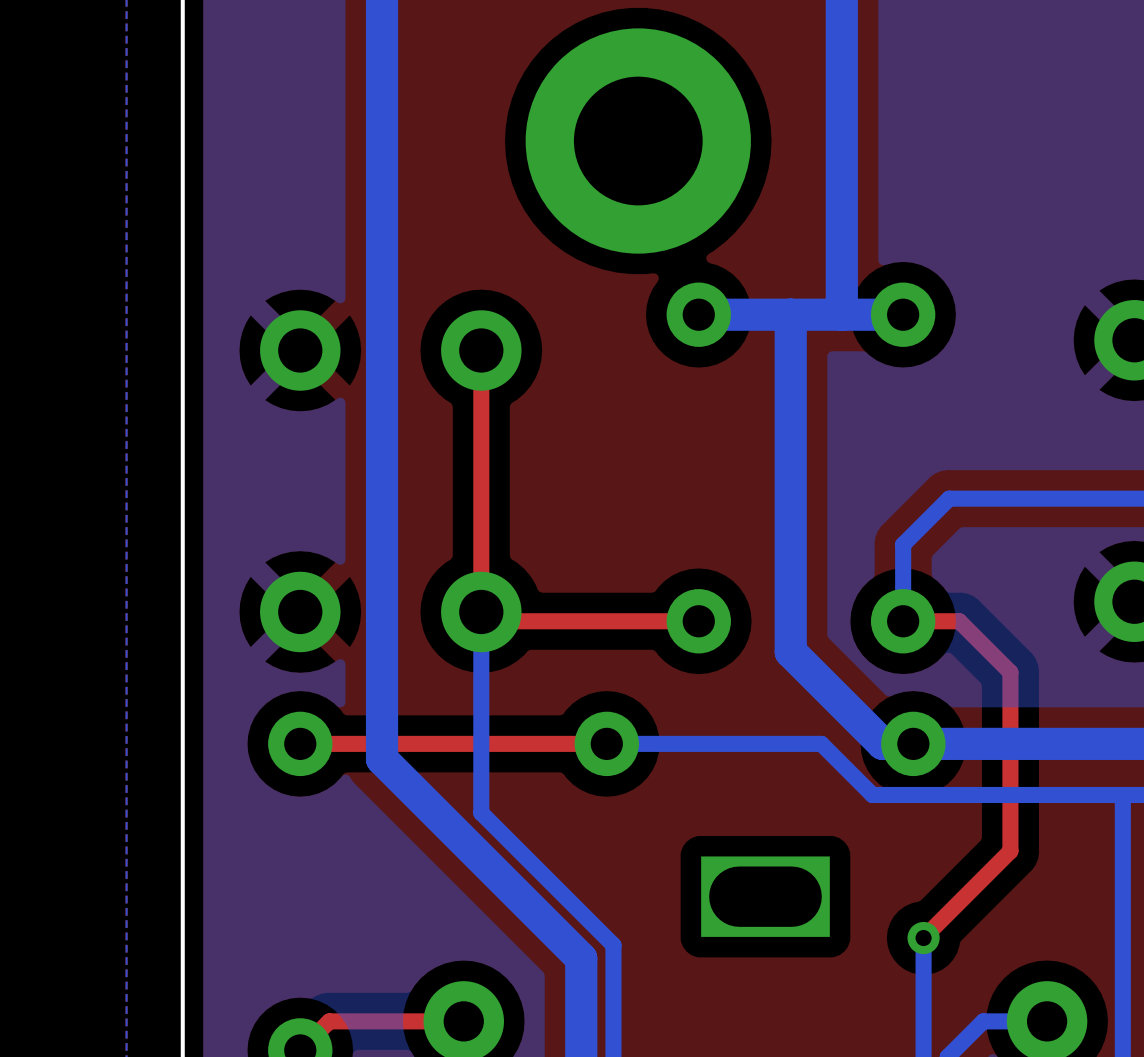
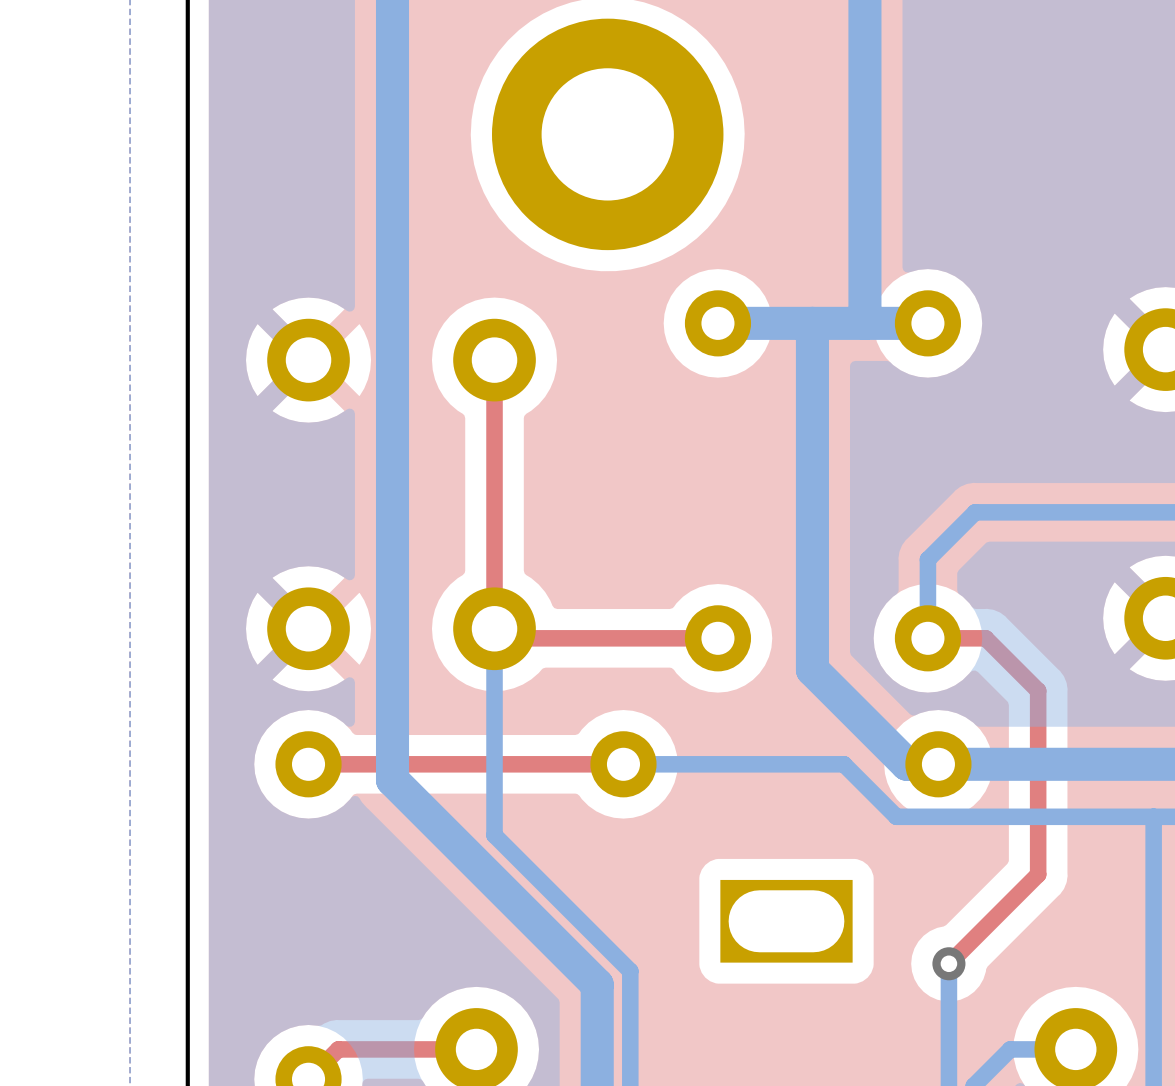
part position: (638, 141) -> (607, 134)

